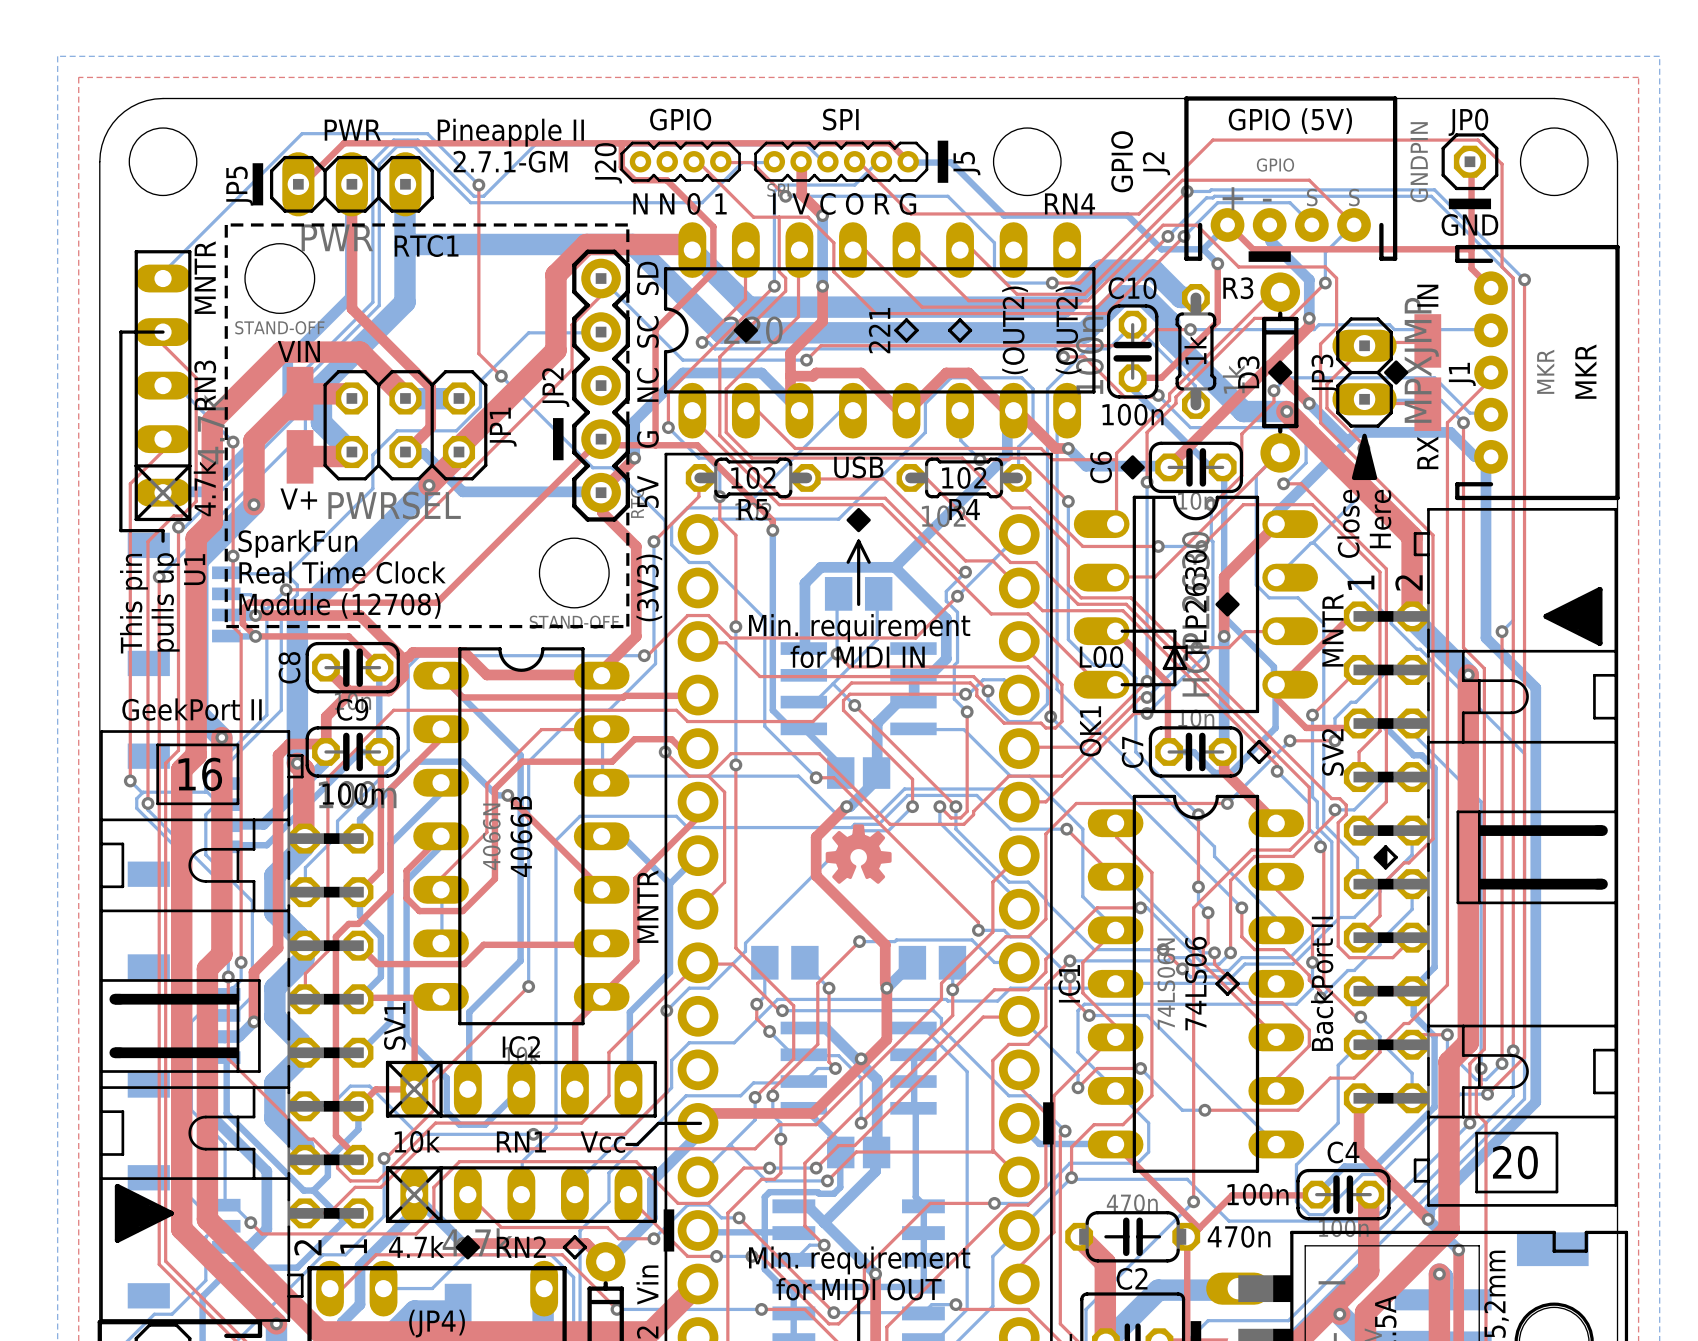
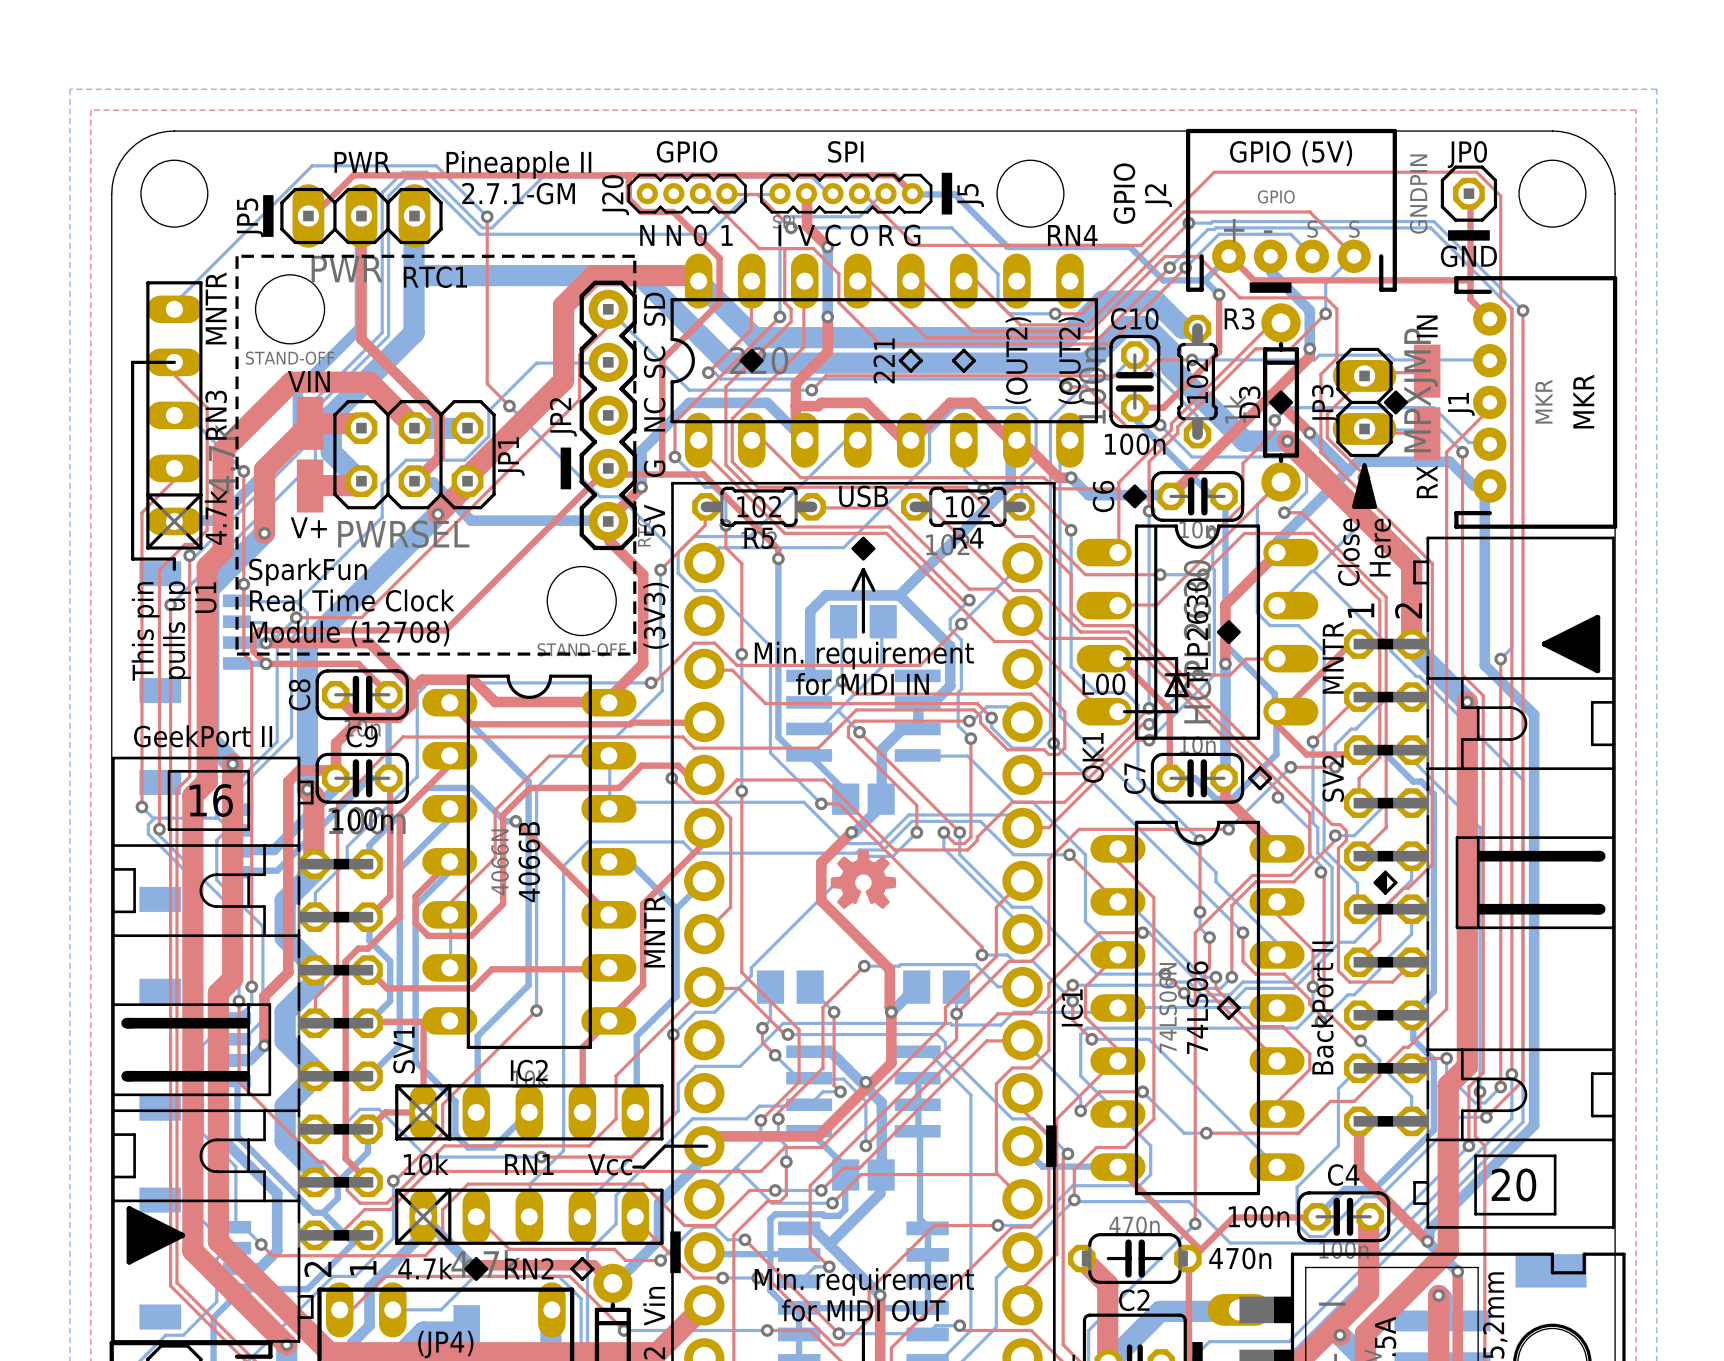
text: 1k (1195, 350) -> 102 (1197, 381)

